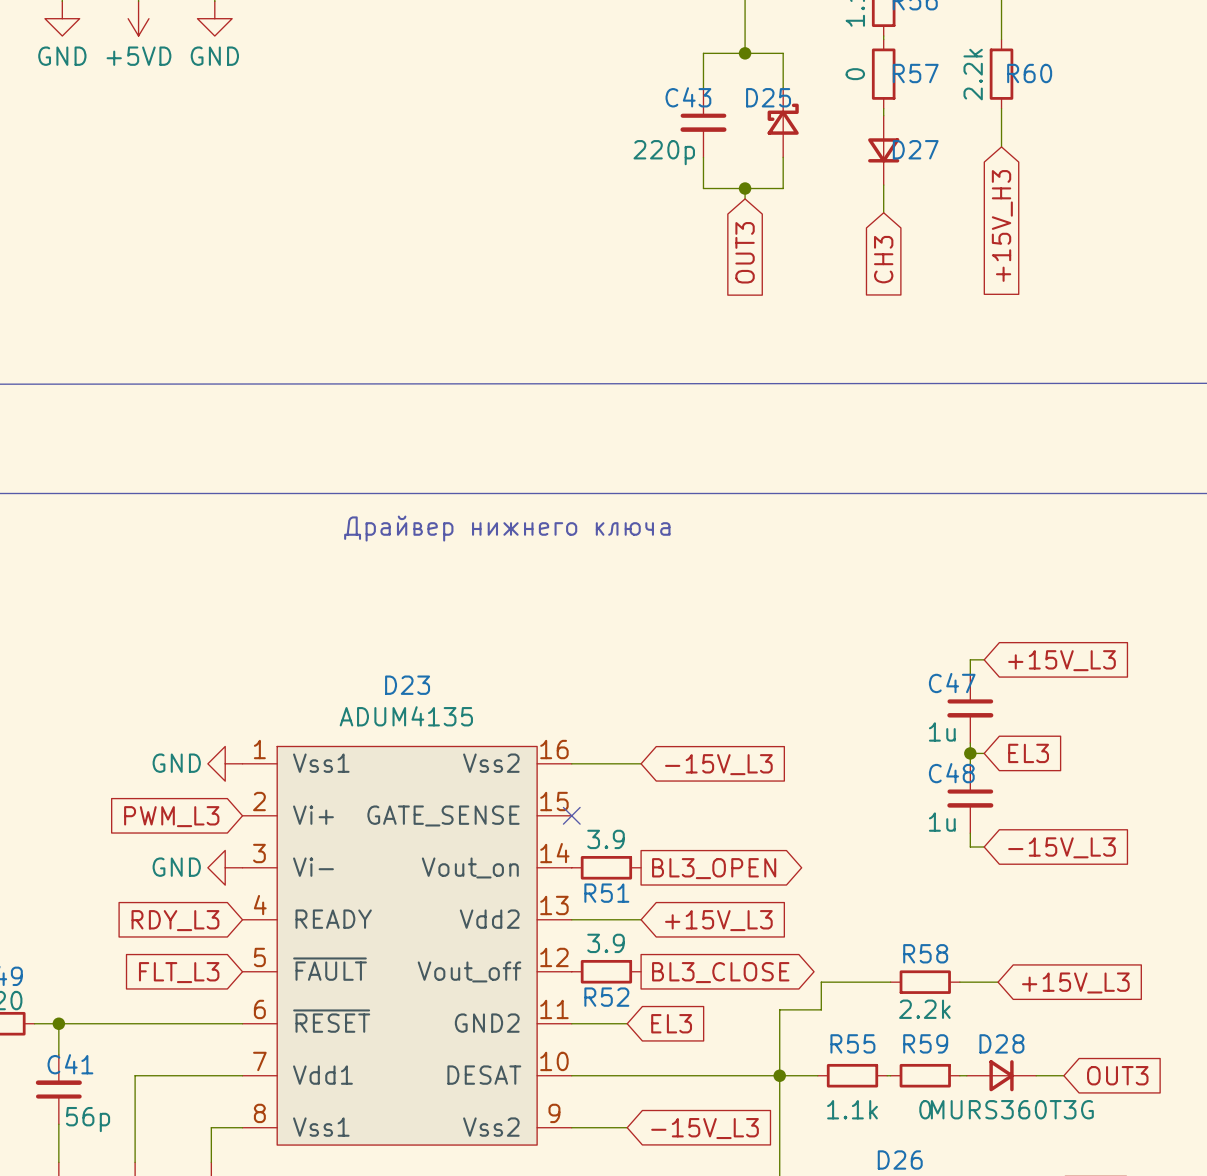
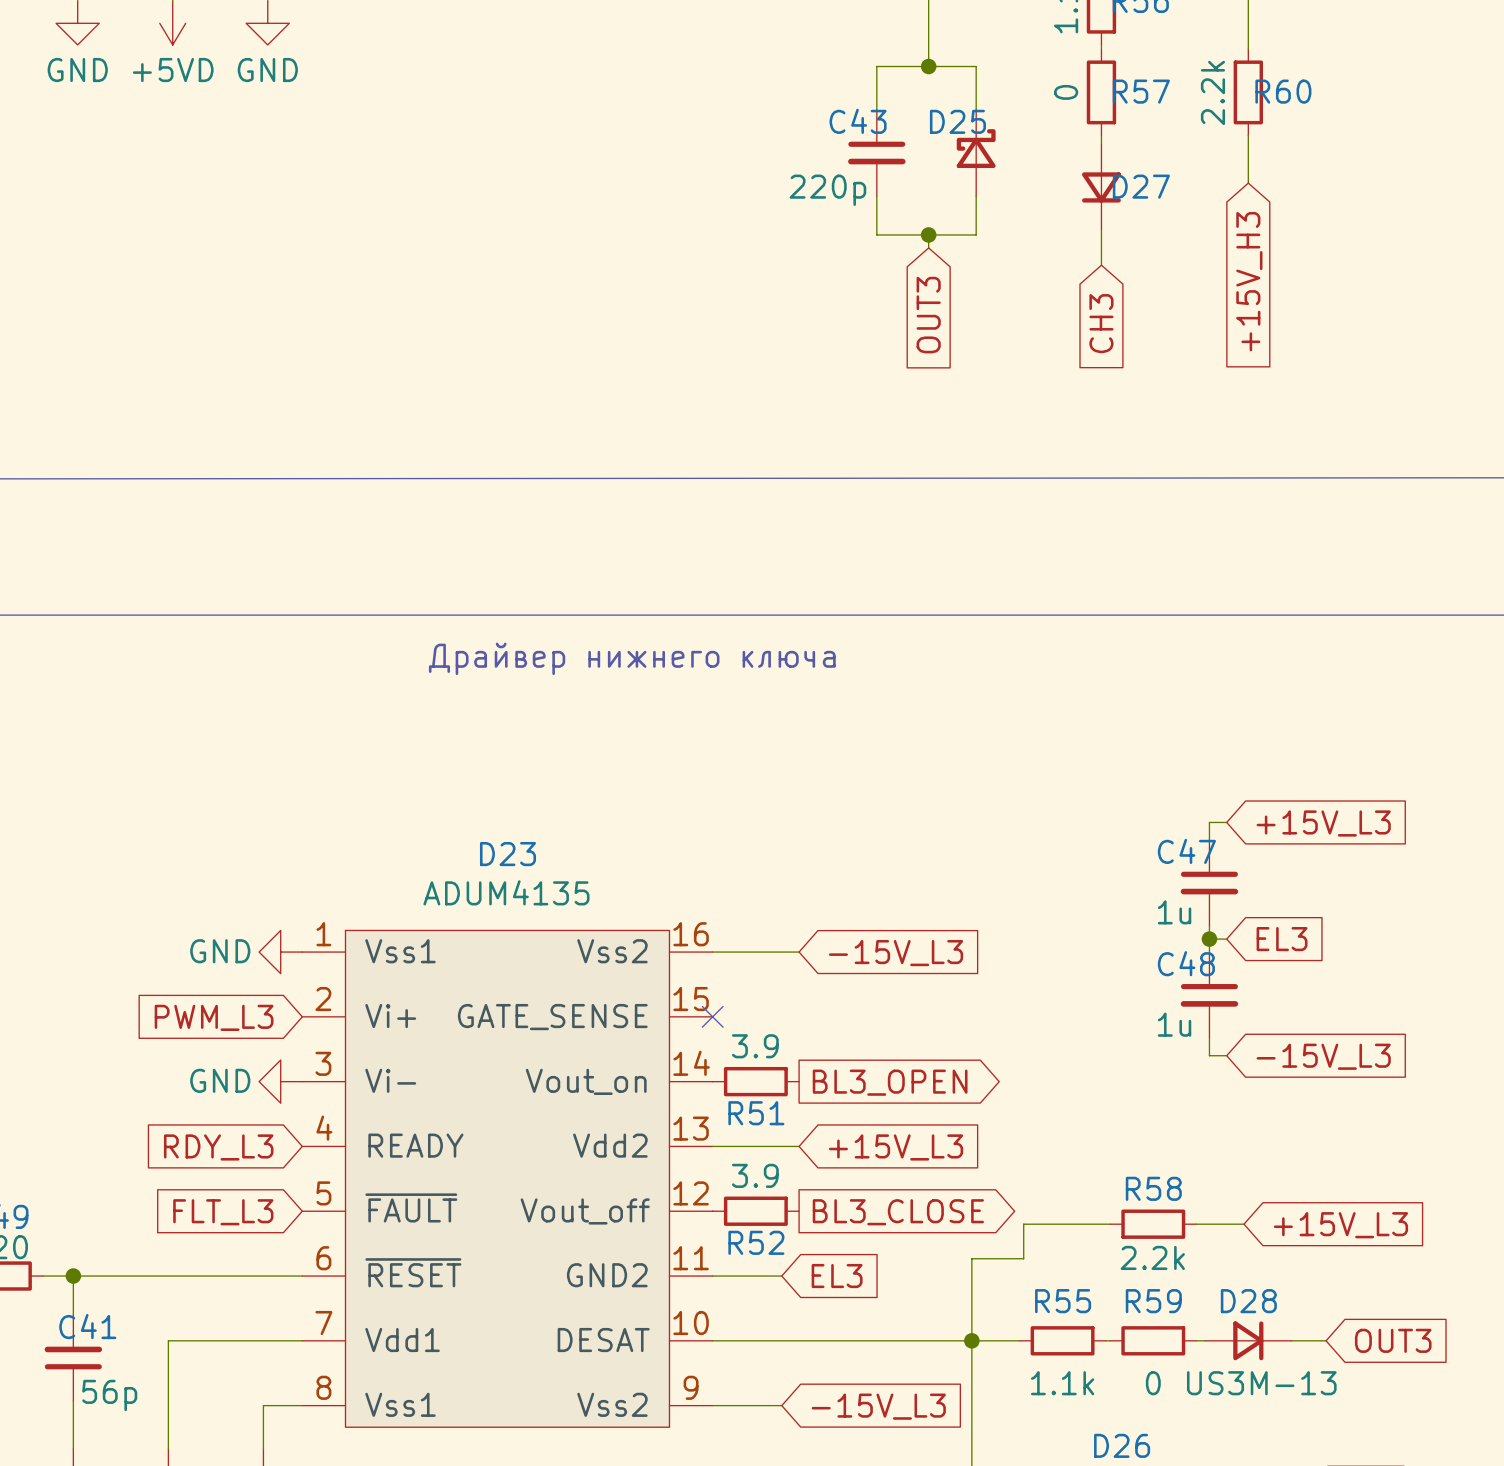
D28 value: MURS360T3G (1012, 1109) -> US3M-13 (1261, 1383)

